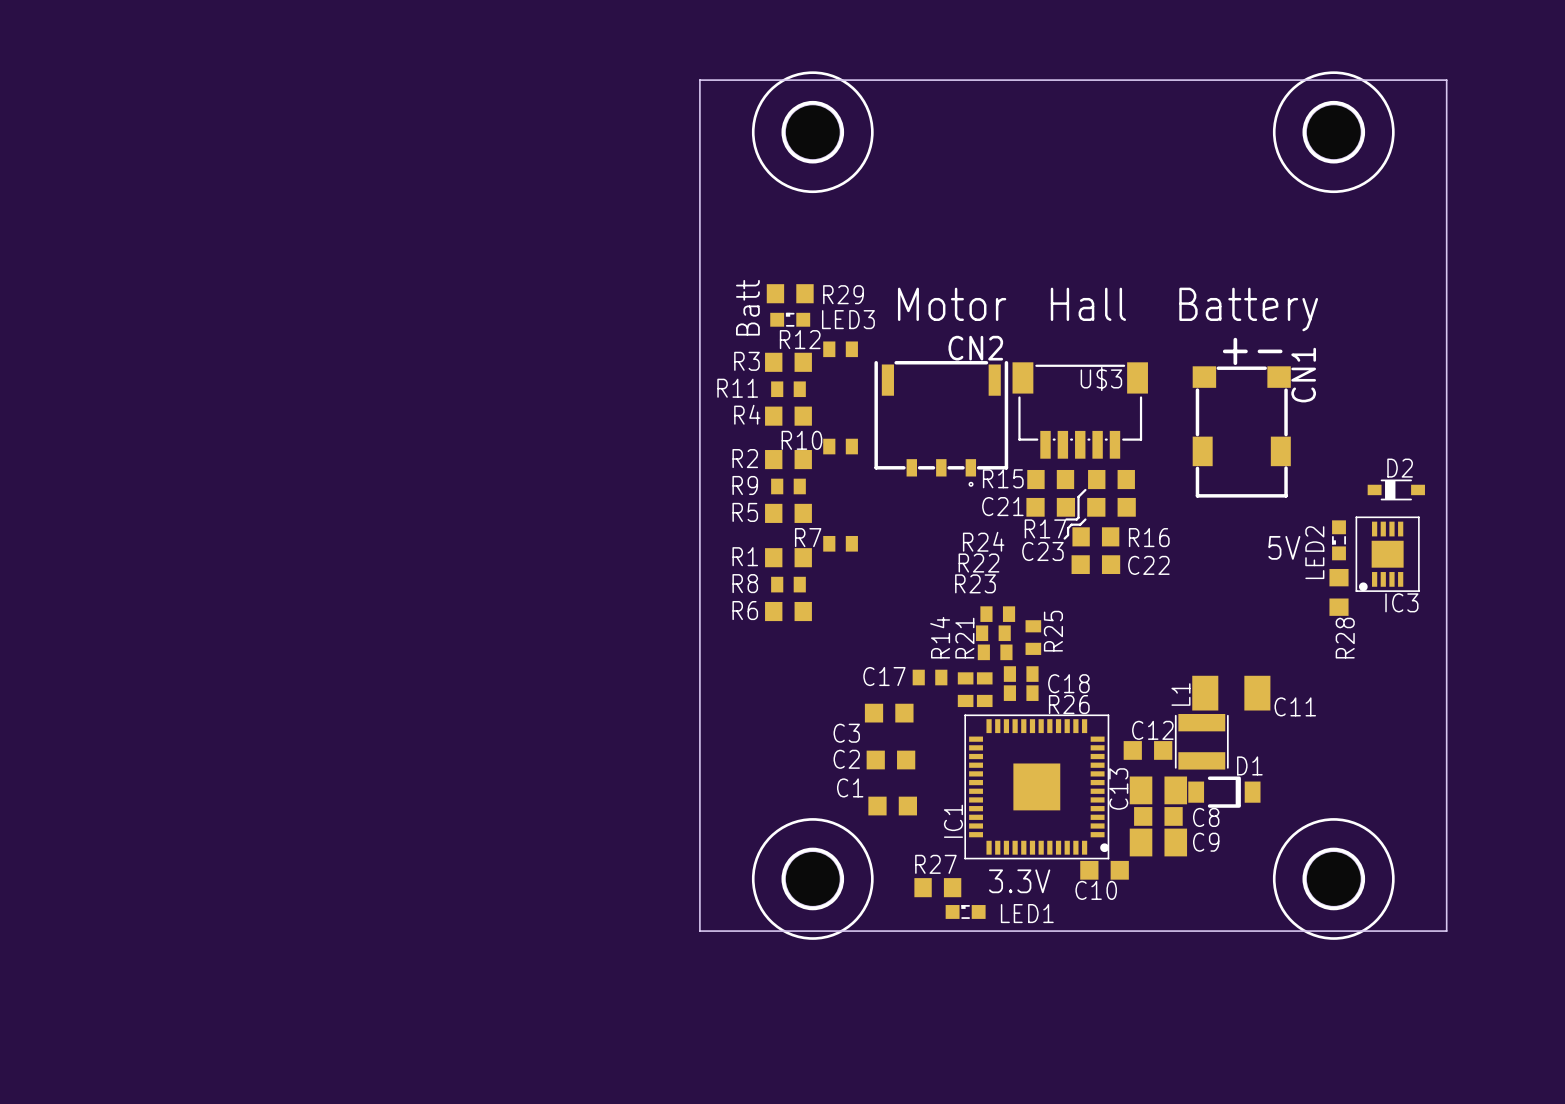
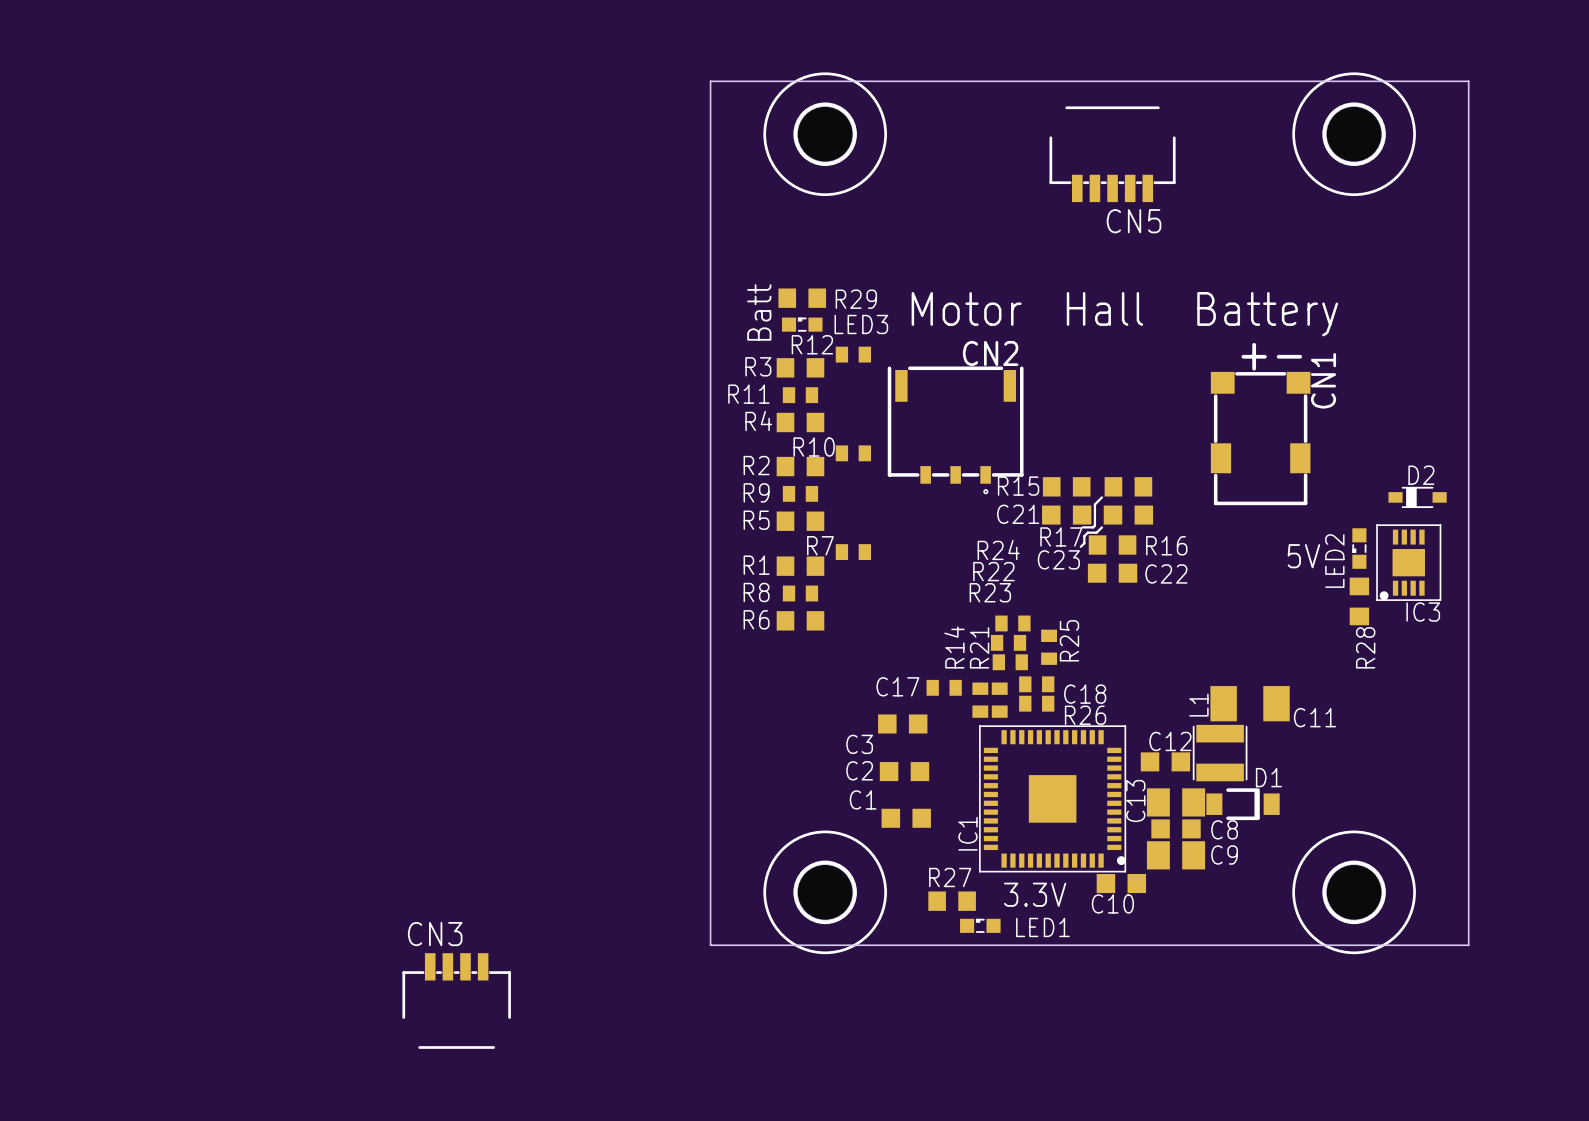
CN5: none -> (1112, 154)
U$3: (1080, 410) -> none
CN3: none -> (456, 1001)

